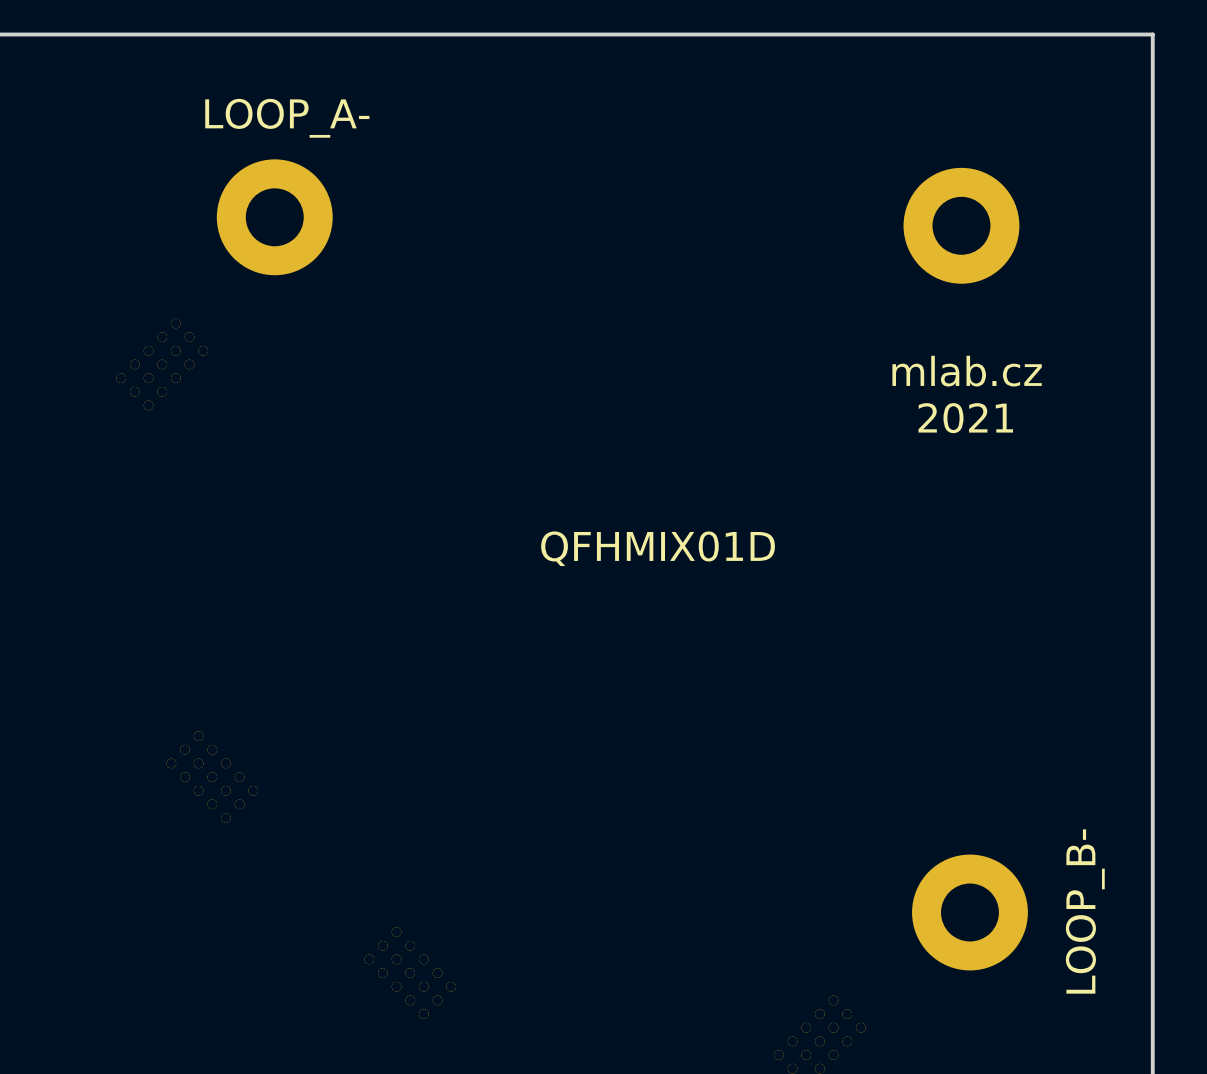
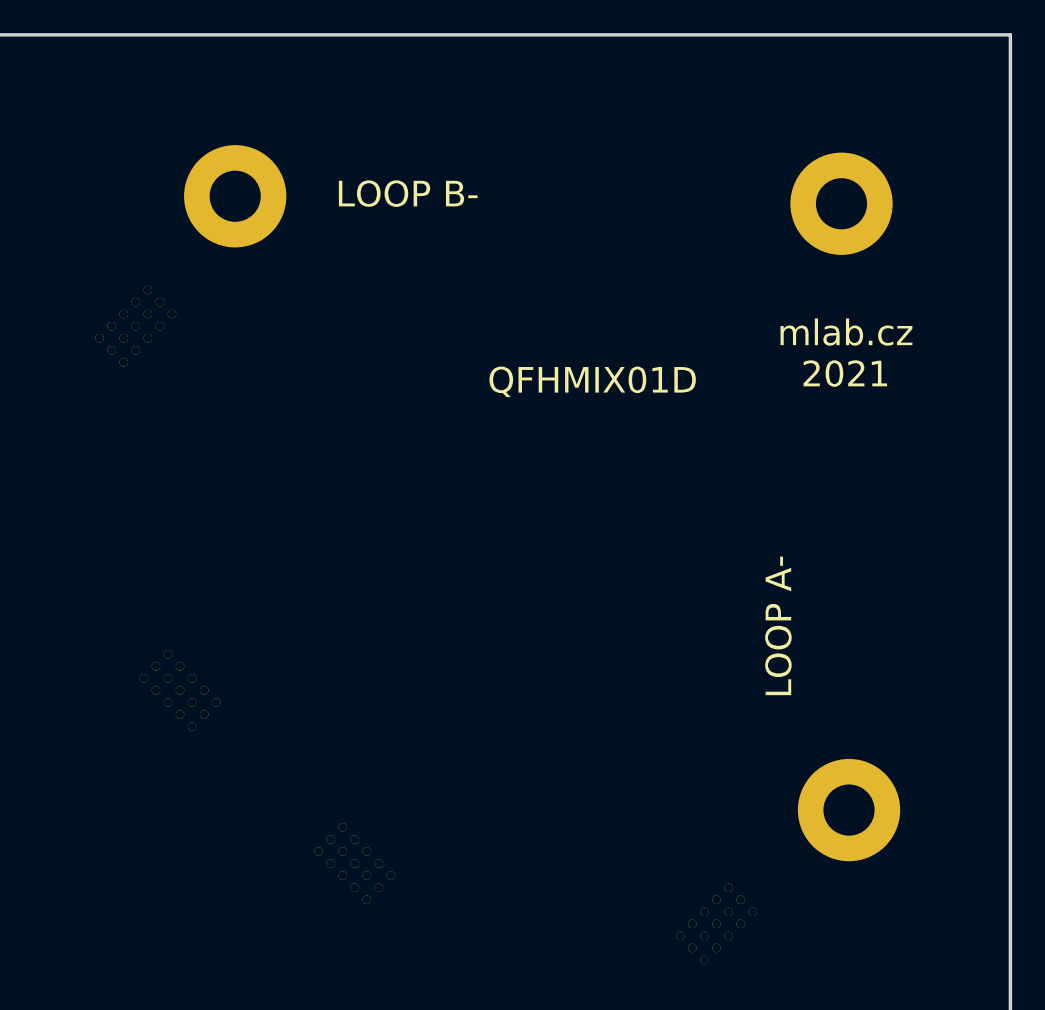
text: LOOP_A- (287, 118) -> none
text: none -> LOOP B- (408, 193)
text position: QFHMIX01D (658, 548) -> QFHMIX01D (592, 381)
text: none -> LOOP A- (778, 625)
text: LOOP_B- (1085, 911) -> none

